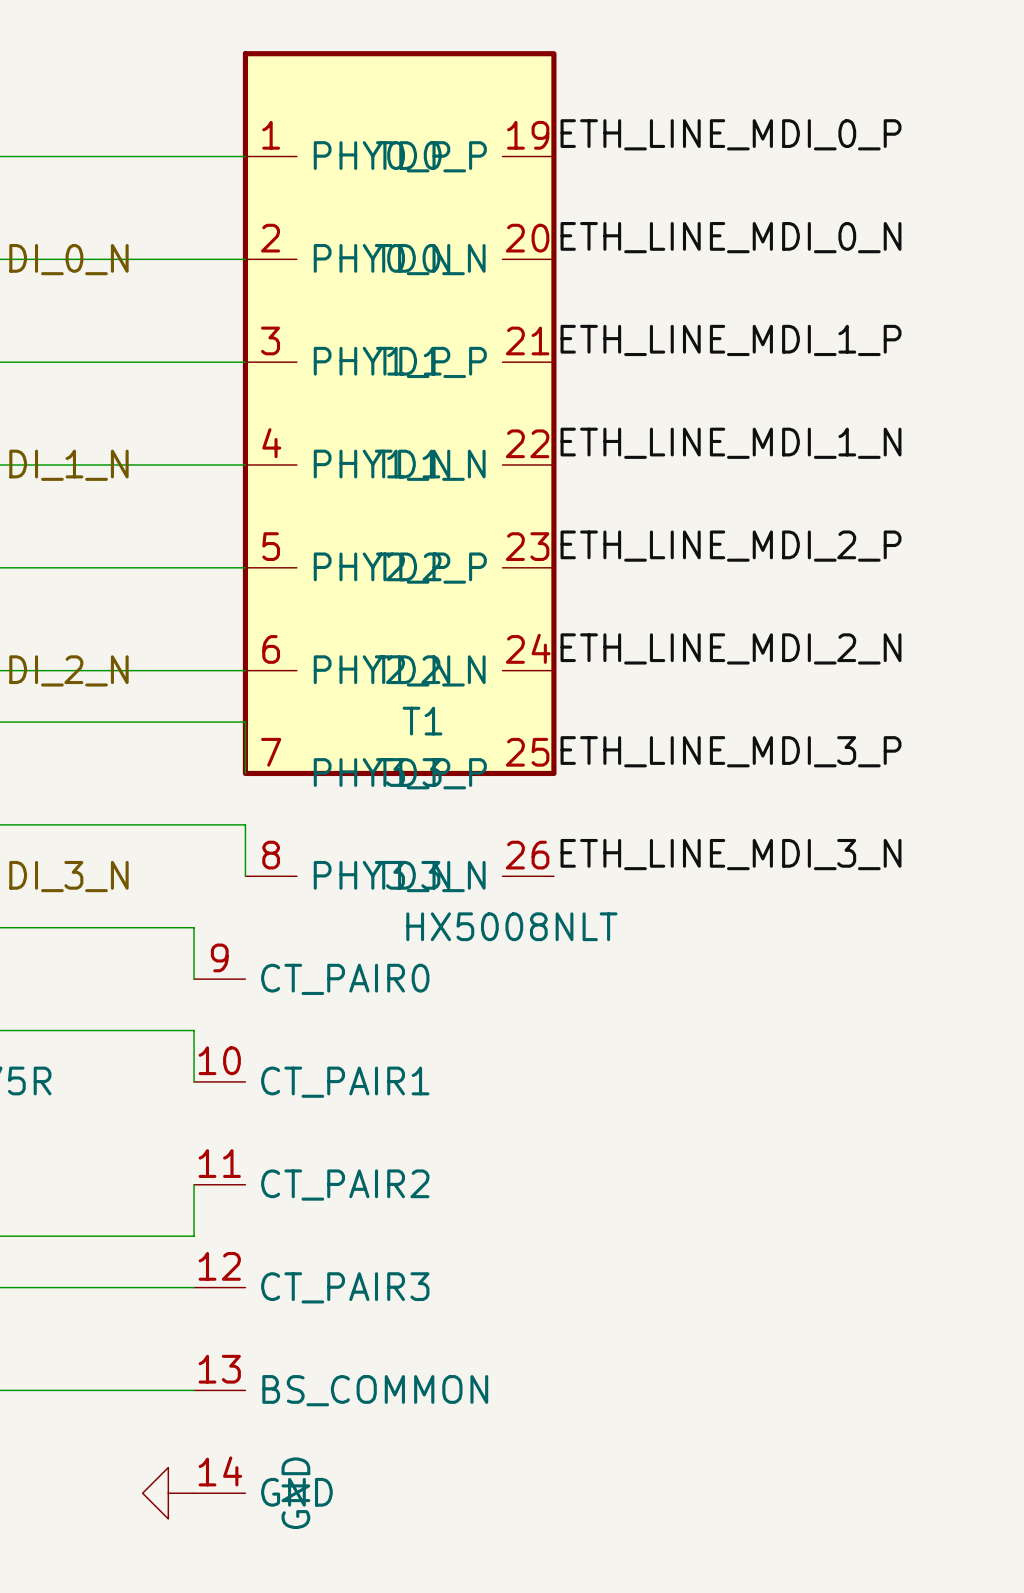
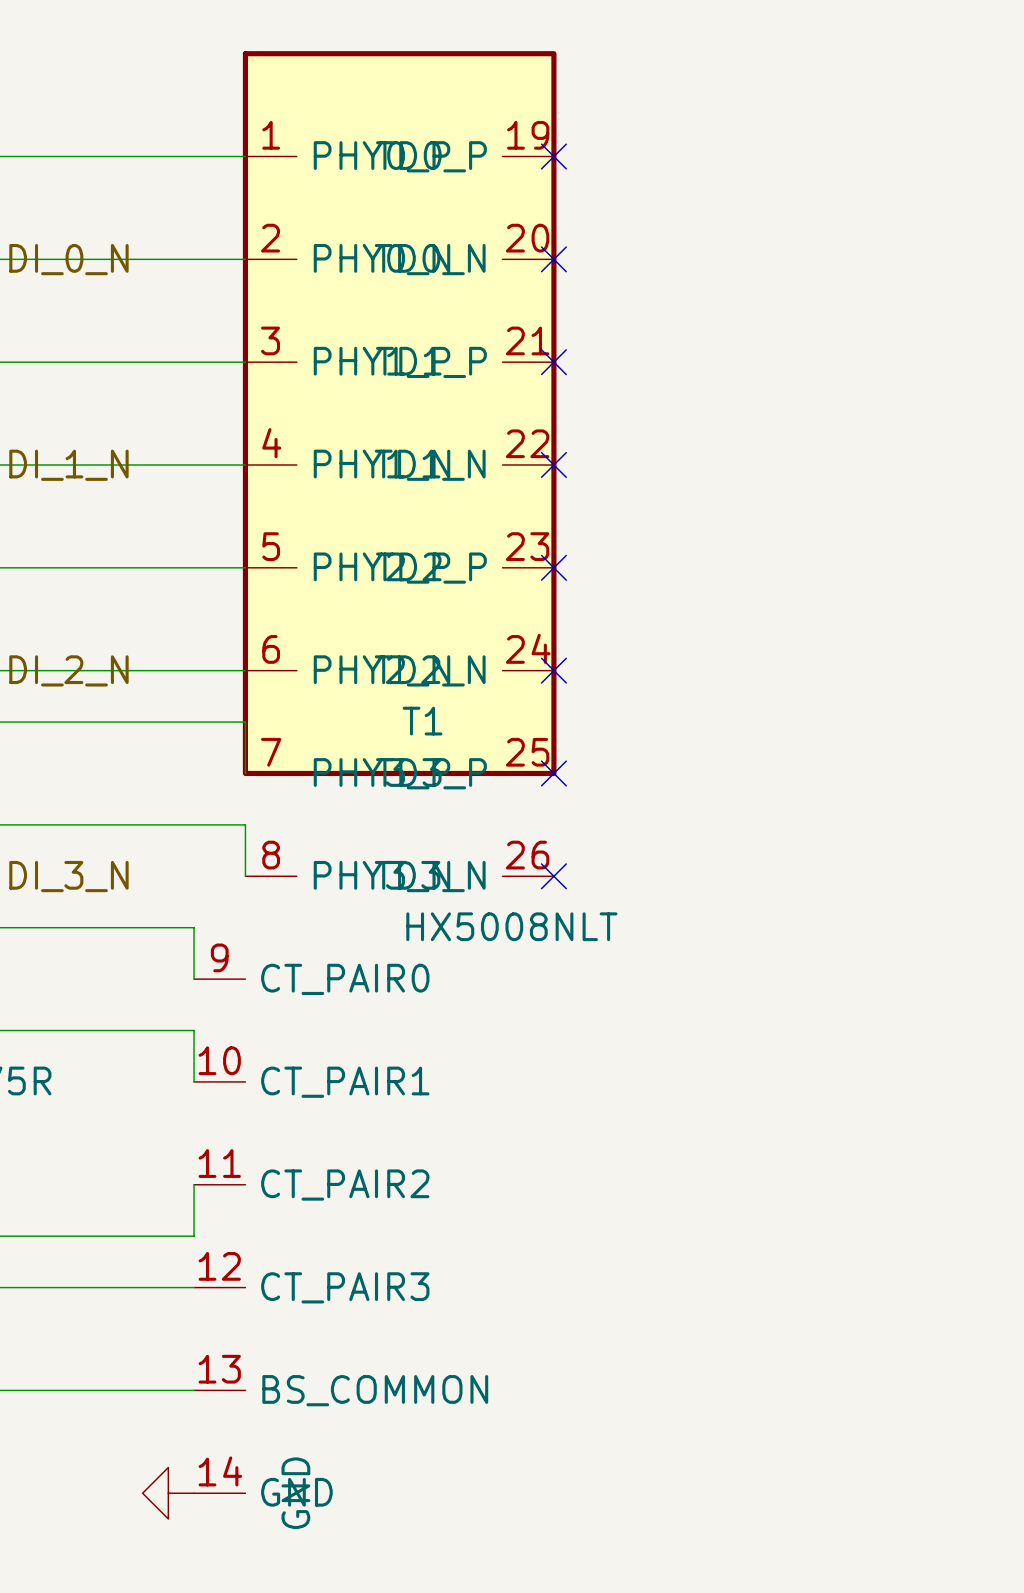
label: ETH_LINE_MDI_0_P (731, 134) -> none
no-connect mark: none -> (553, 156)
label: ETH_LINE_MDI_0_N (731, 237) -> none
no-connect mark: none -> (553, 259)
label: ETH_LINE_MDI_1_P (731, 340) -> none
no-connect mark: none -> (553, 362)
label: ETH_LINE_MDI_1_N (731, 443) -> none
no-connect mark: none -> (553, 464)
label: ETH_LINE_MDI_2_P (731, 546) -> none
no-connect mark: none -> (553, 567)
label: ETH_LINE_MDI_2_N (731, 648) -> none
no-connect mark: none -> (553, 670)
label: ETH_LINE_MDI_3_P (731, 751) -> none
no-connect mark: none -> (553, 773)
label: ETH_LINE_MDI_3_N (731, 854) -> none
no-connect mark: none -> (553, 876)

